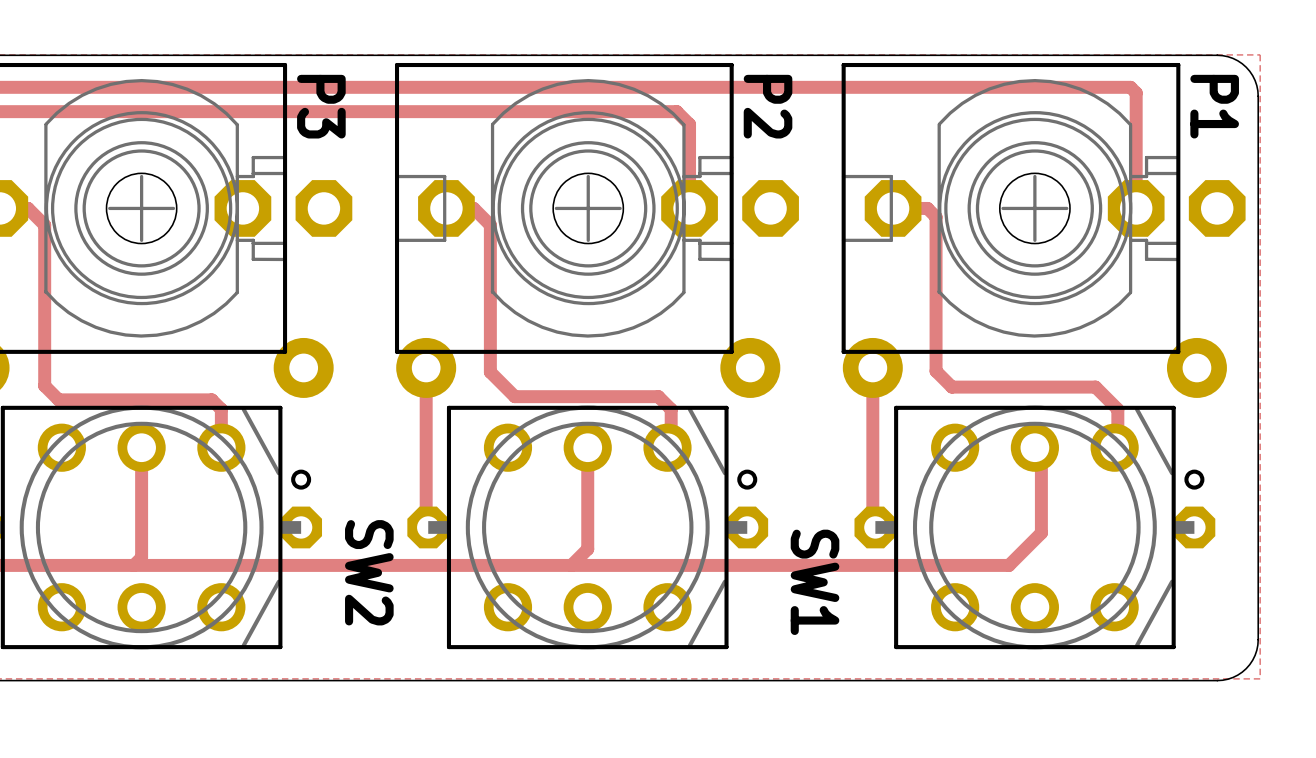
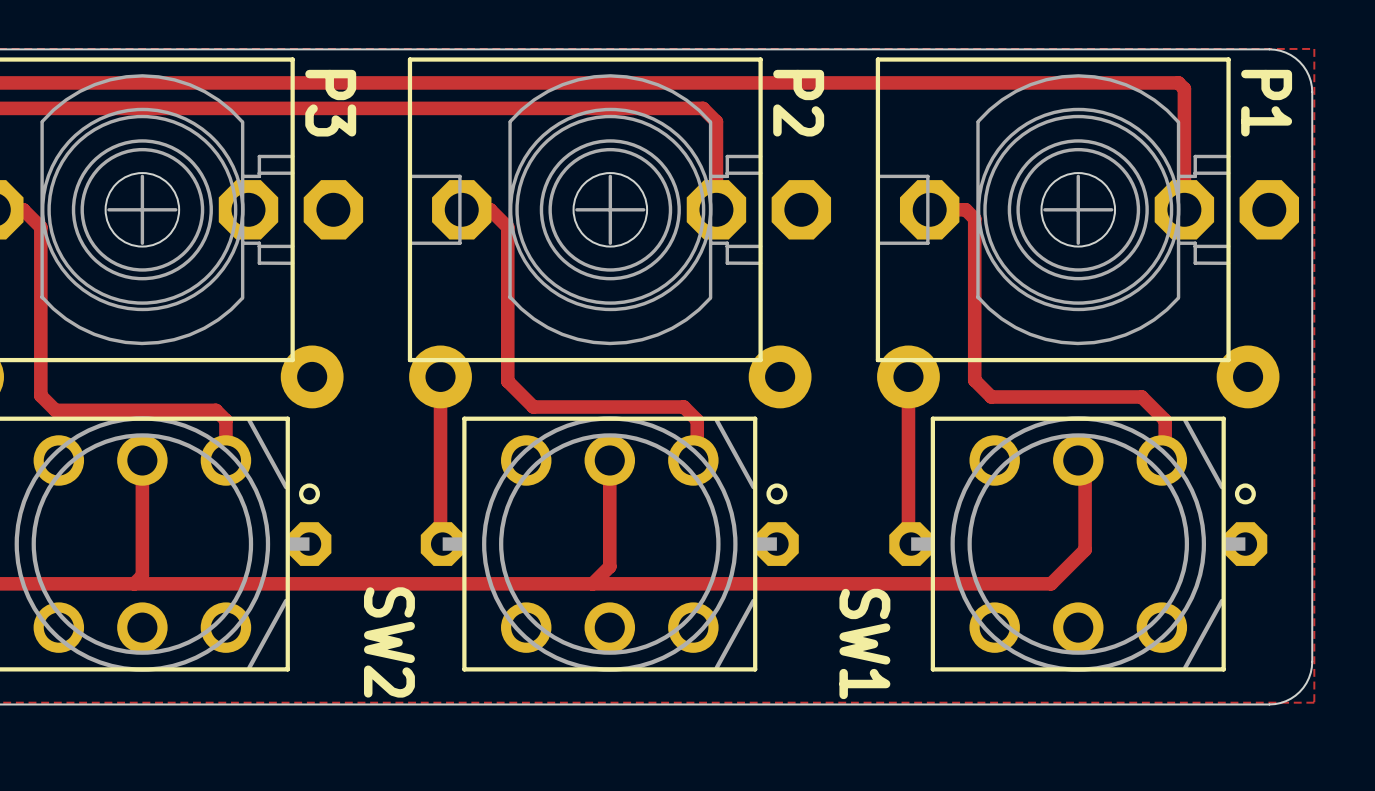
SW2 name position: SW2 (369, 572) -> SW2 (389, 642)
SW1 name position: SW1 (815, 582) -> SW1 (864, 643)

